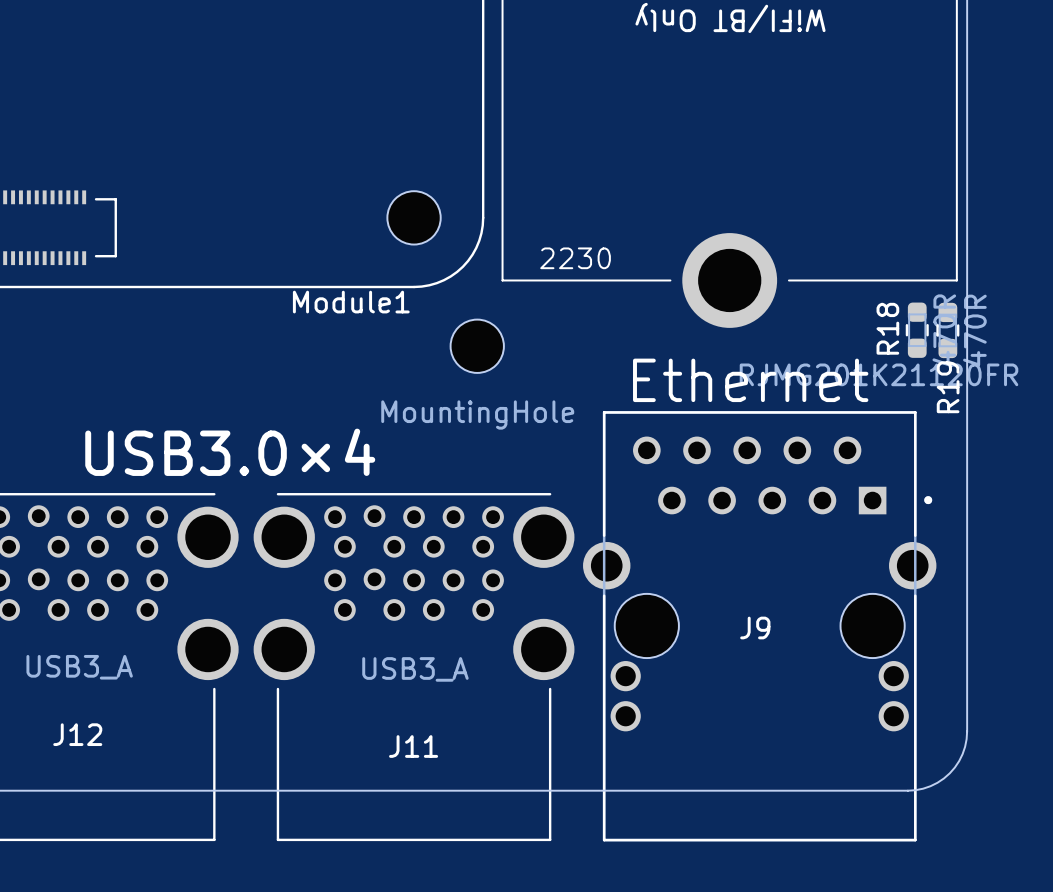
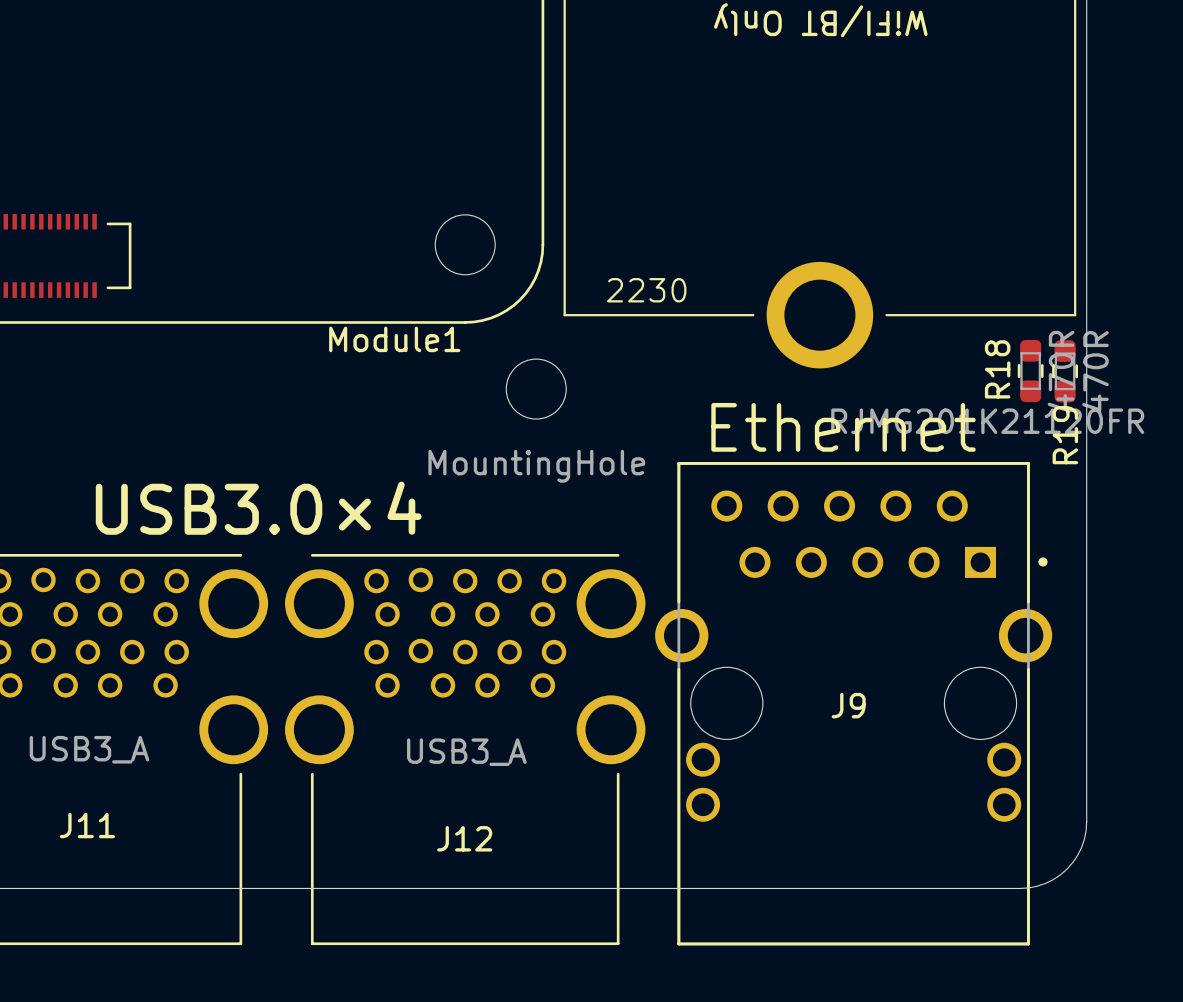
J12 name: J12 (77, 734) -> J11 (87, 825)
J11 name: J11 (413, 746) -> J12 (464, 838)

